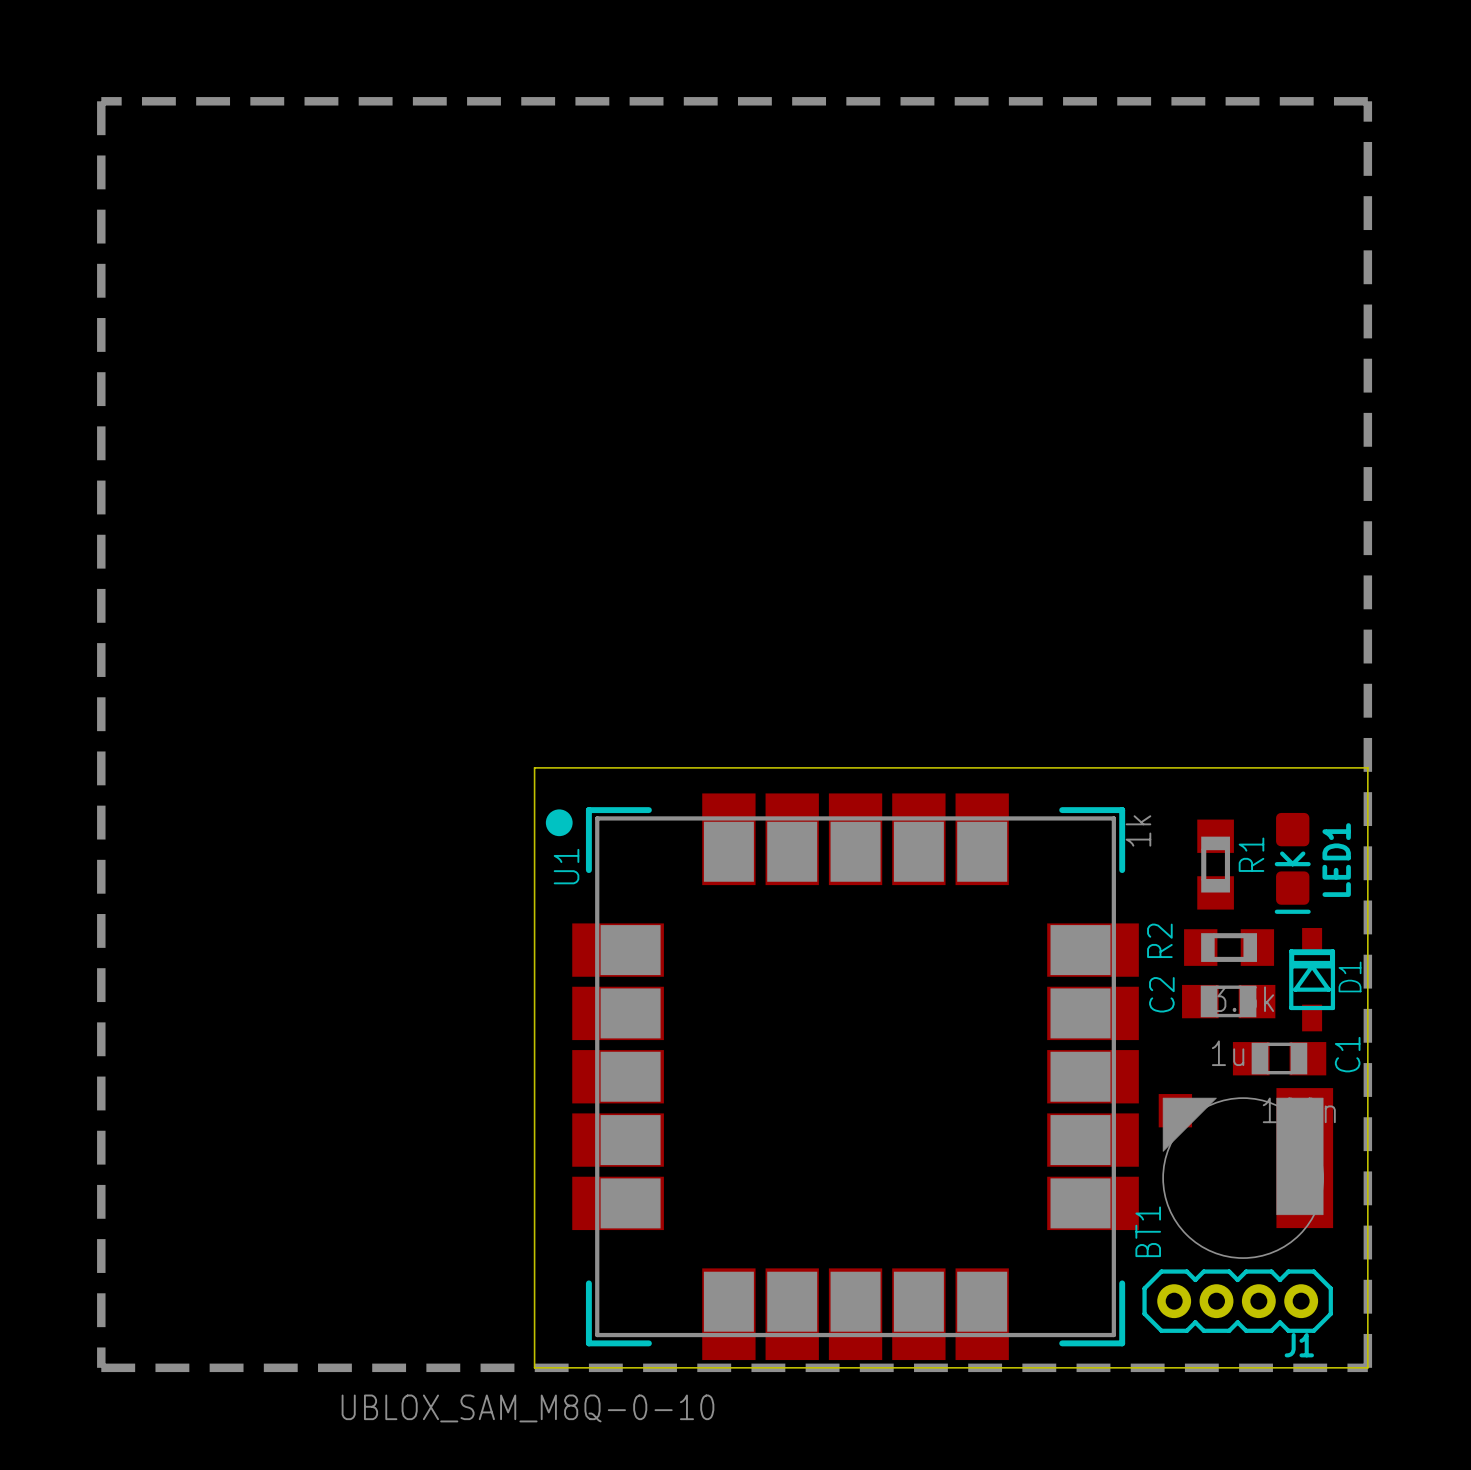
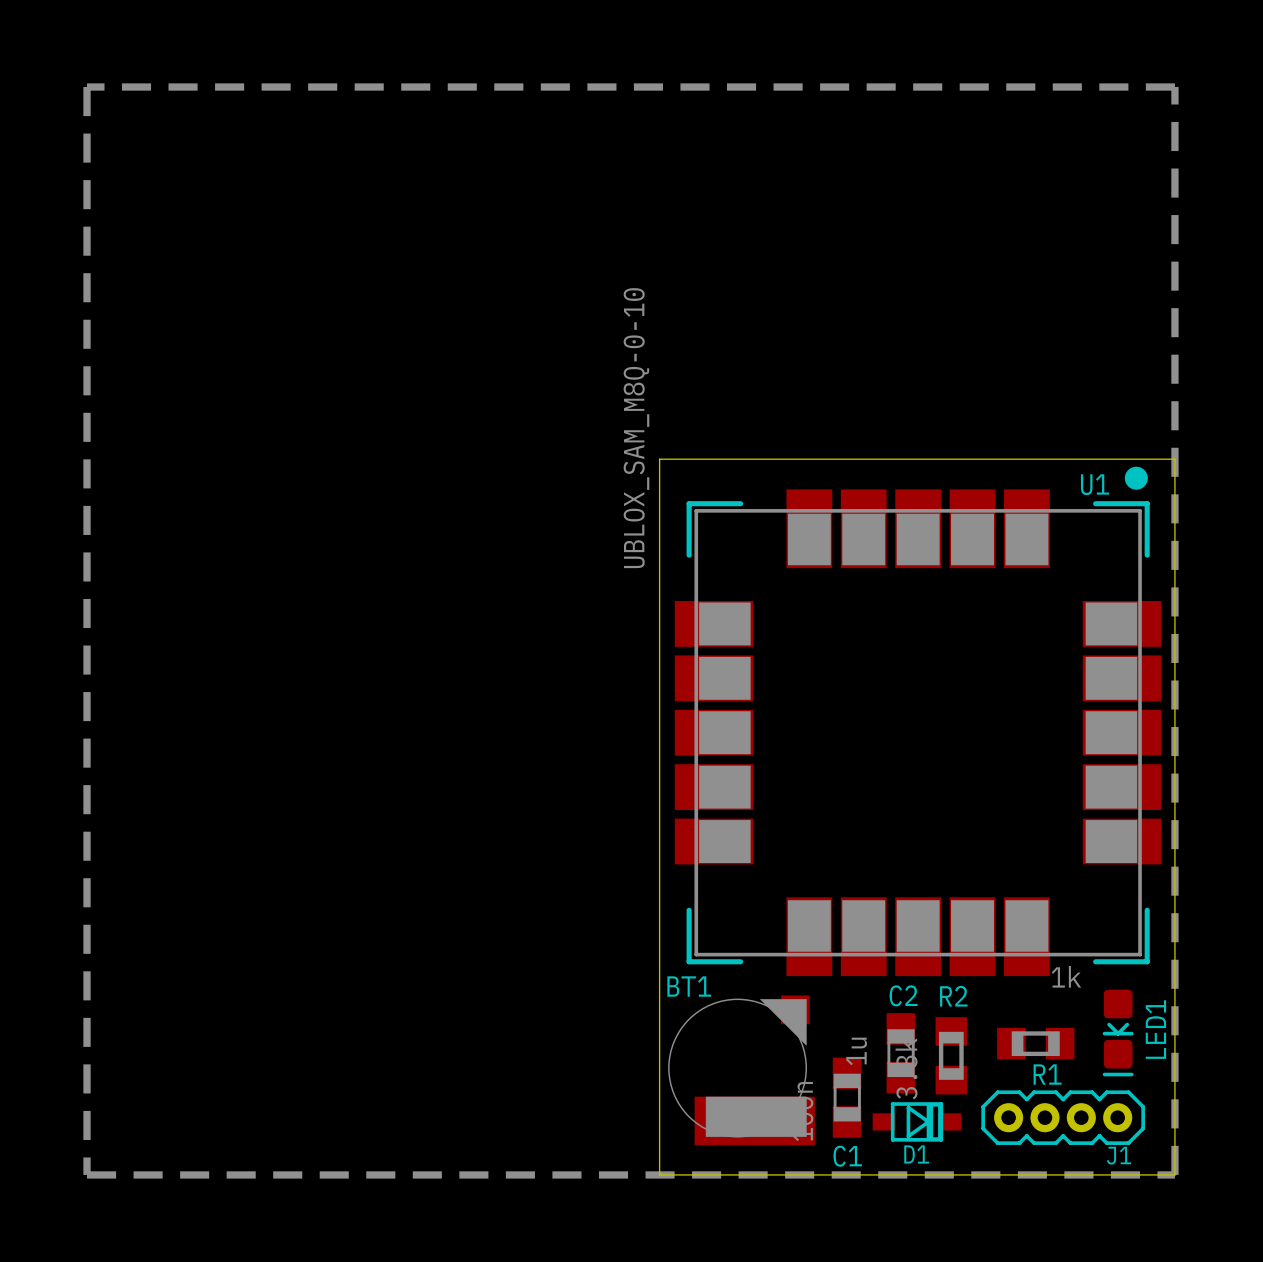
board edge: (1367, 767) (534, 767) (534, 1367) (767, 1367) -> (1174, 659) (1174, 459) (659, 459) (659, 1174)
LED1 position: (1292, 863) -> (1118, 1033)
R1 rotation: 0° (1215, 864) -> 90° clockwise (1035, 1043)
R1 position: (1215, 864) -> (1035, 1043)
R2 rotation: 0° (1229, 947) -> 90° clockwise (951, 1055)
R2 position: (1229, 947) -> (951, 1055)
D1 rotation: 0° (1312, 979) -> 90° clockwise (917, 1121)
D1 position: (1312, 979) -> (917, 1121)
C2 rotation: 0° (1228, 1001) -> 90° clockwise (900, 1053)
C2 position: (1228, 1001) -> (900, 1053)
C1 rotation: 0° (1279, 1058) -> 90° clockwise (847, 1097)
C1 position: (1279, 1058) -> (847, 1097)
U1 rotation: 0° (842, 1076) -> 90° clockwise (918, 721)
BT1 rotation: 0° (1245, 1173) -> 90° clockwise (741, 1070)
BT1 position: (1245, 1173) -> (741, 1070)

